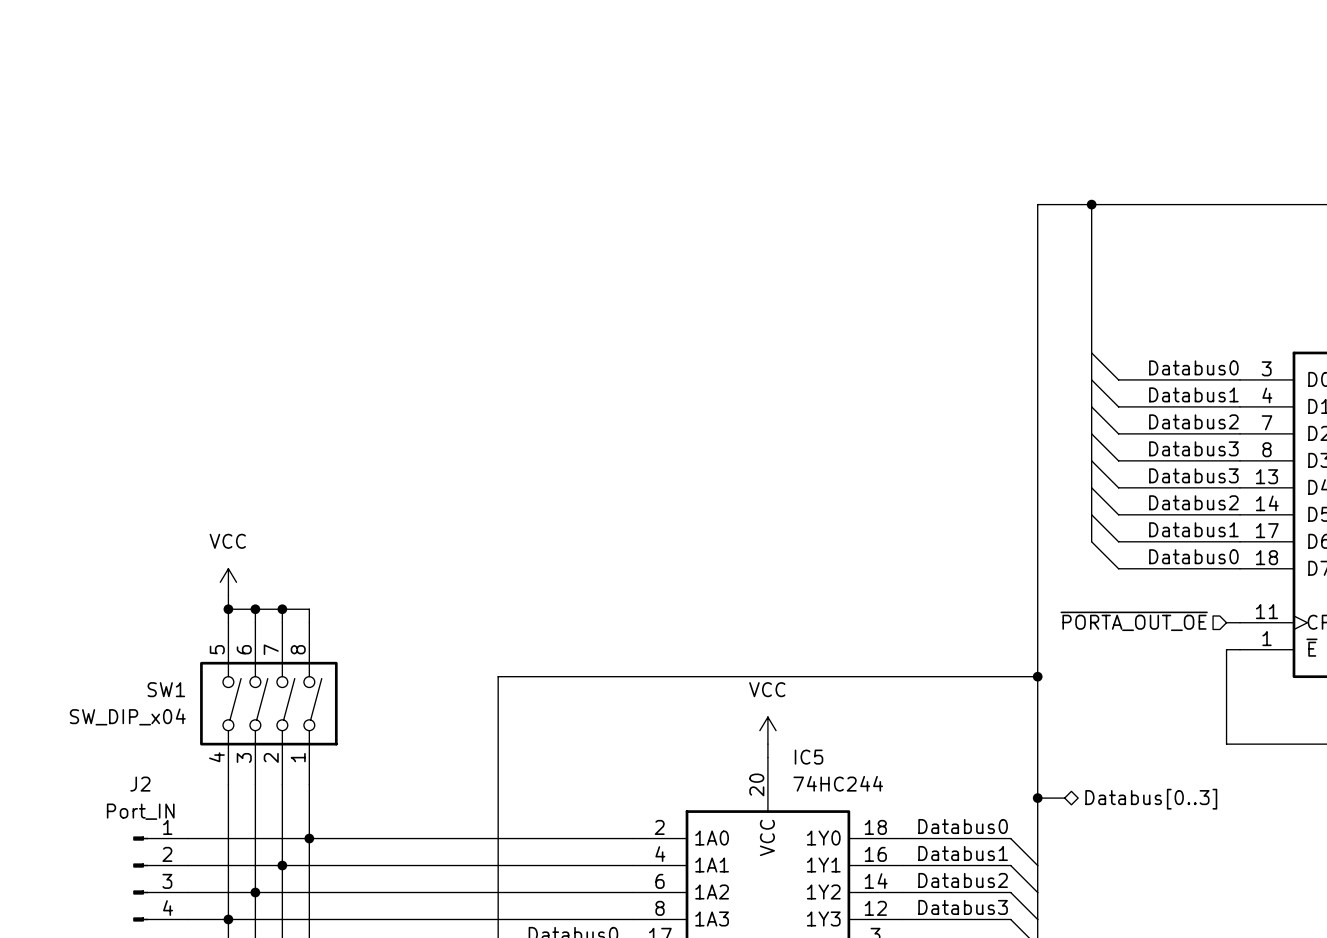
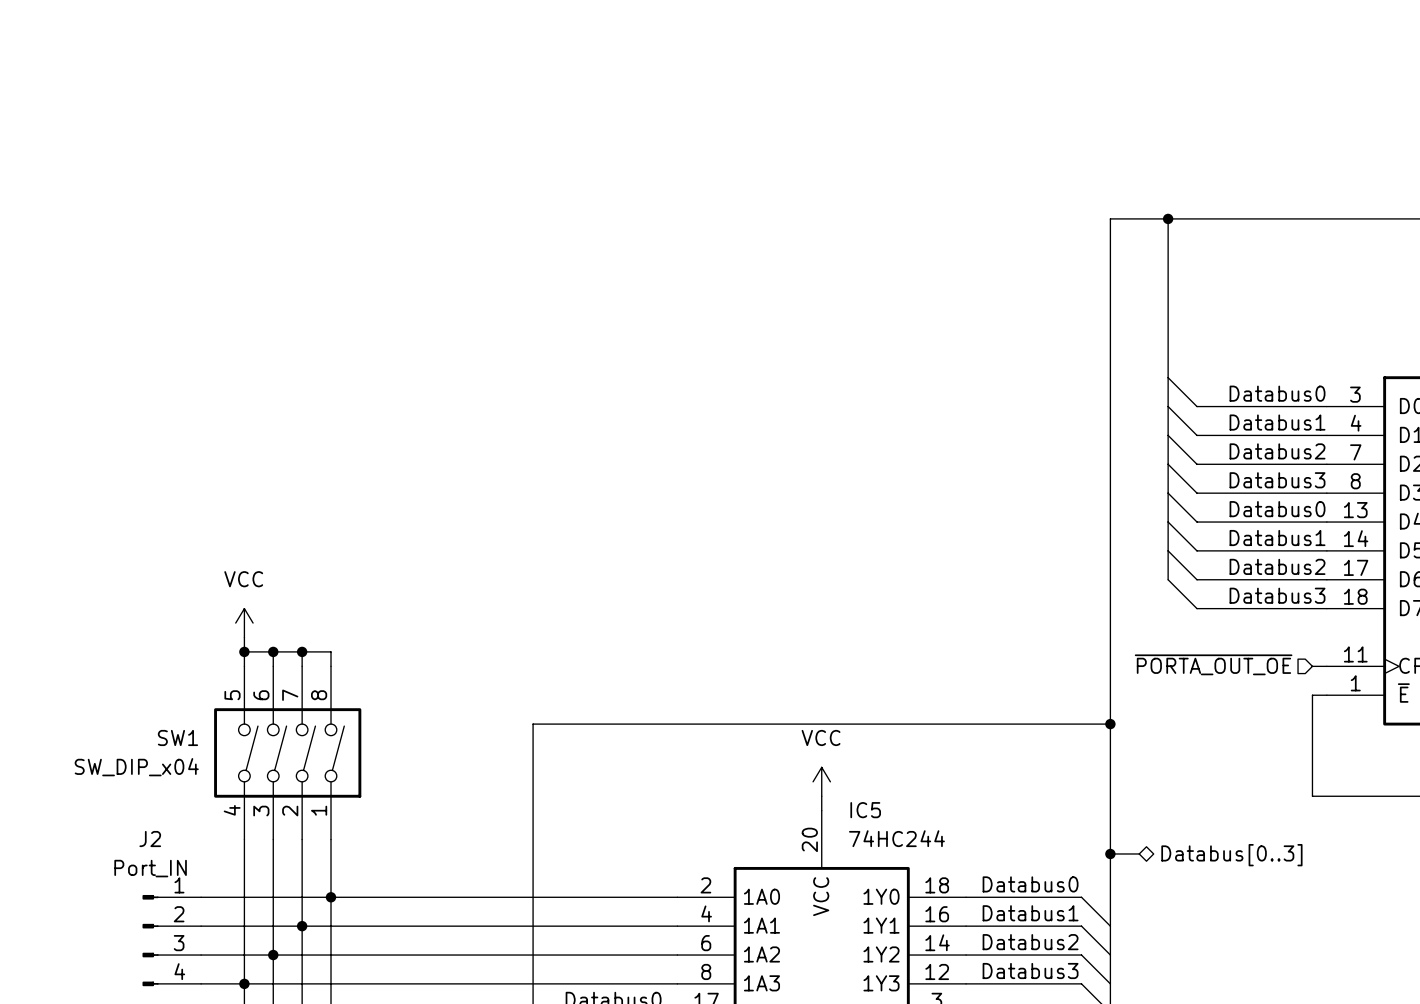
label: Databus3 (1193, 475) -> Databus0 (1277, 509)
label: Databus2 (1193, 502) -> Databus1 (1277, 538)
label: Databus1 (1193, 529) -> Databus2 (1277, 566)
label: Databus0 (1193, 556) -> Databus3 (1277, 595)

